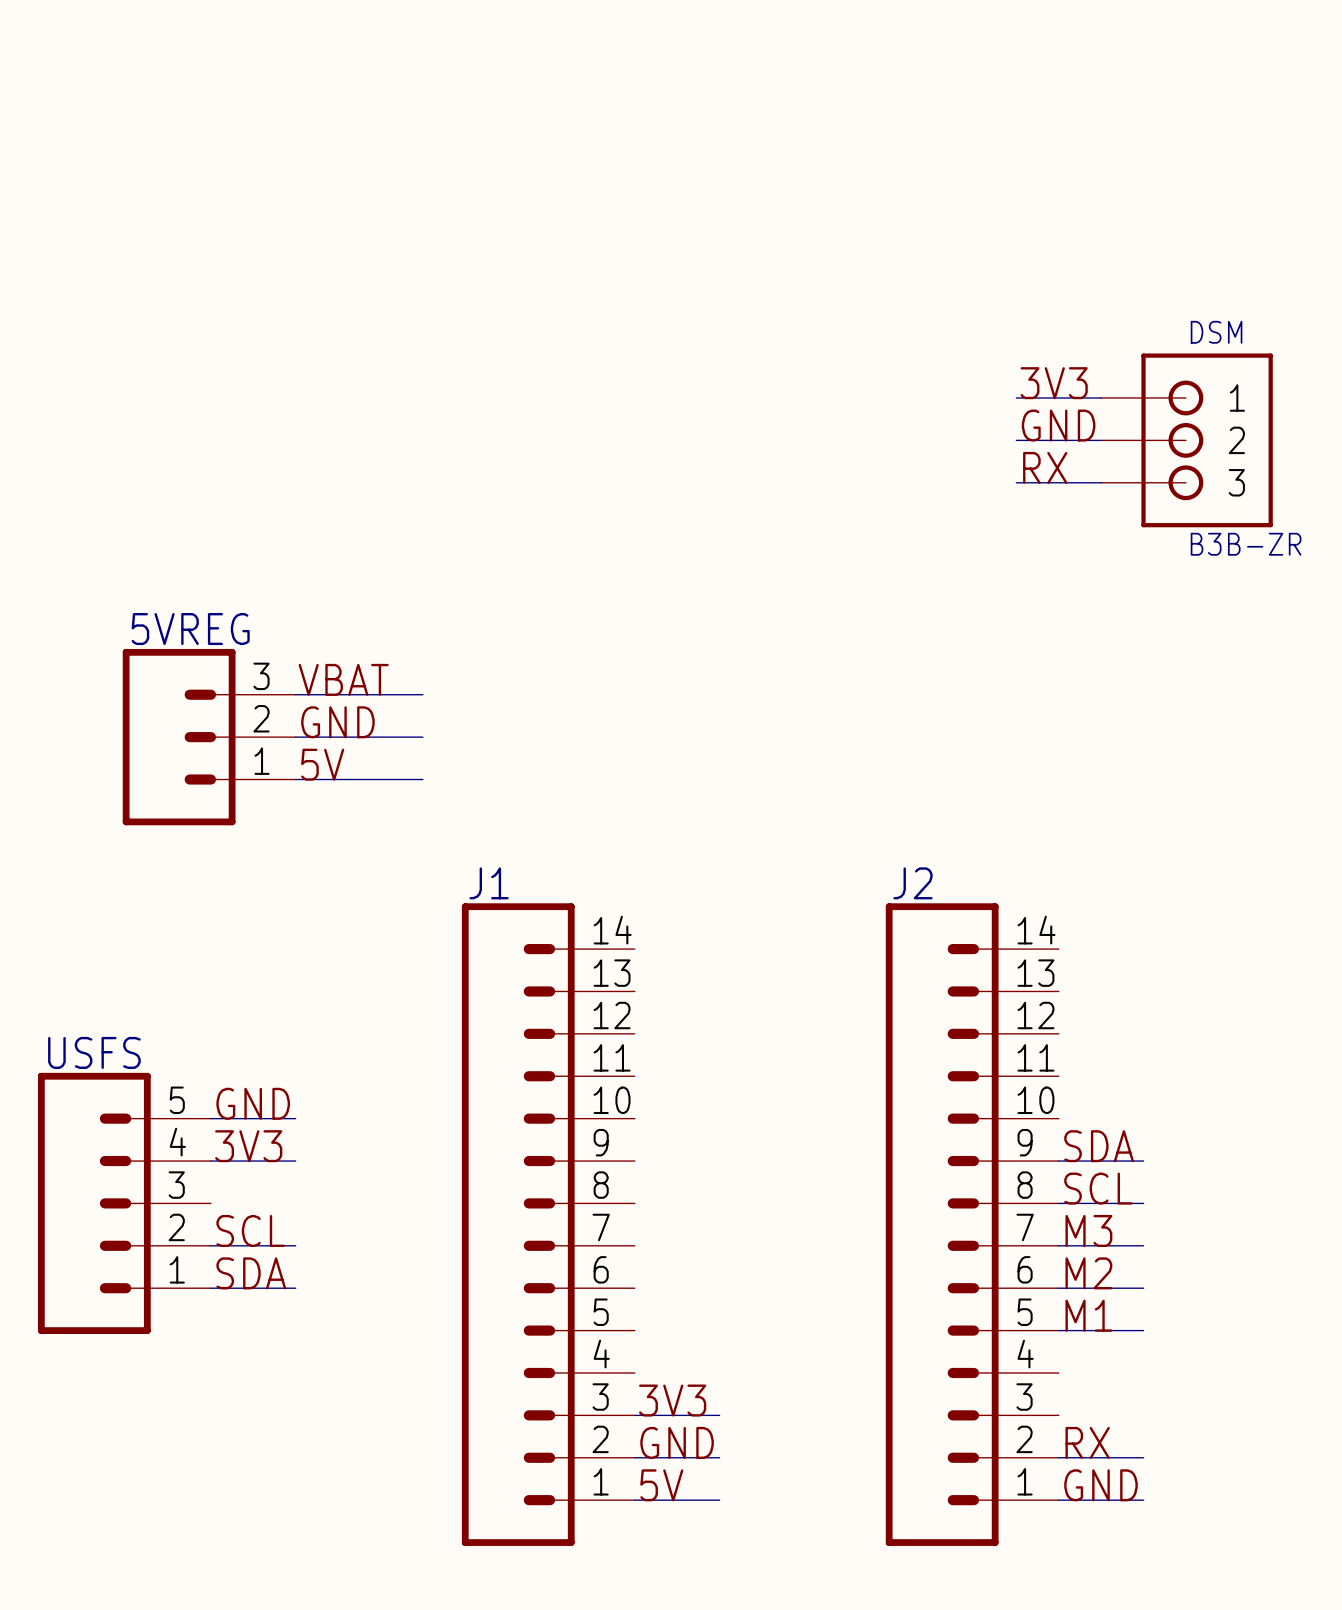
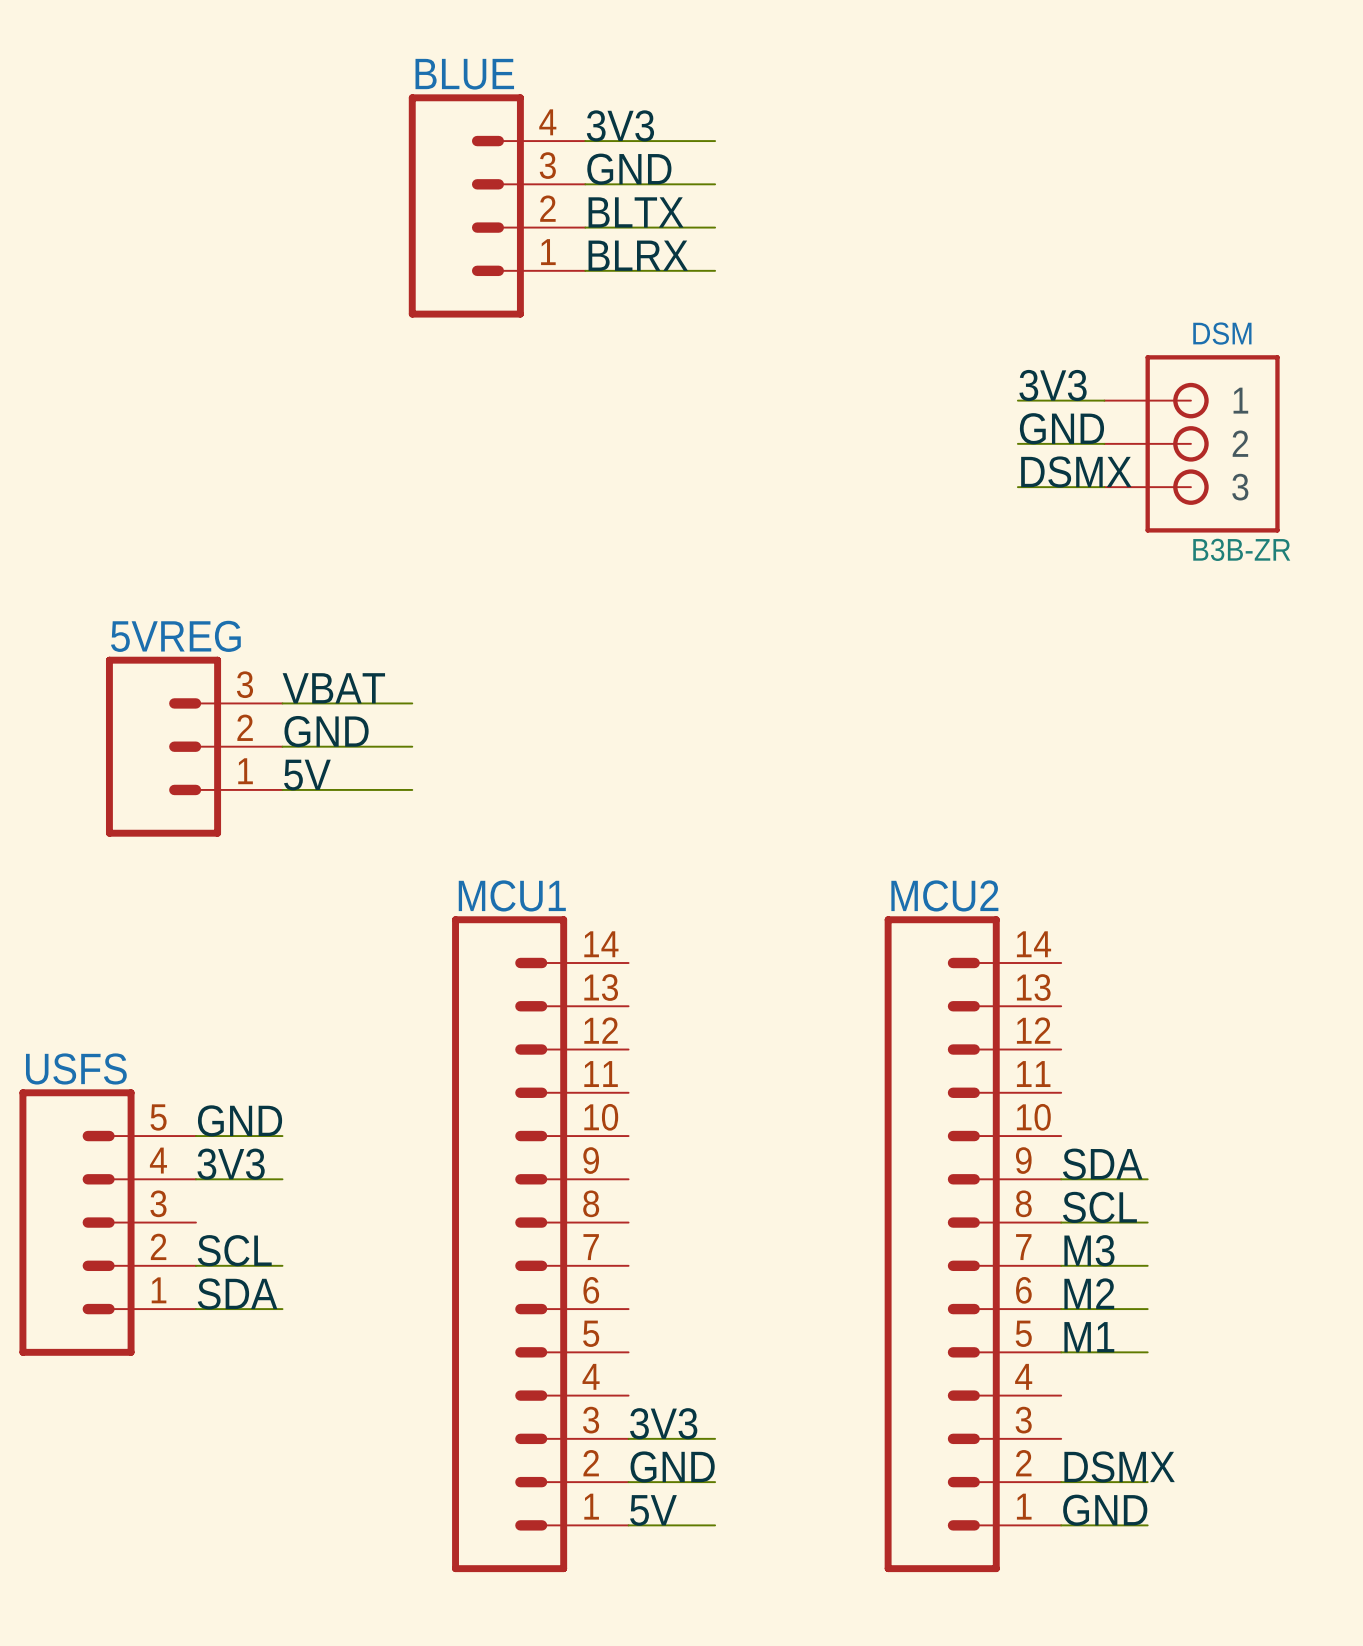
label: none -> 3V3 (620, 125)
wire: none -> (585, 141) (715, 141)
label: none -> GND (629, 169)
wire: none -> (585, 184) (715, 184)
BLUE: none -> (497, 205)
label: none -> BLTX (636, 212)
wire: none -> (585, 227) (715, 227)
label: none -> BLRX (638, 255)
wire: none -> (585, 270) (715, 270)
label: RX (1045, 467) -> DSMX (1076, 471)
J1 name: J1 (489, 883) -> MCU1 (512, 895)
J2 name: J2 (912, 883) -> MCU2 (944, 895)
label: RX (1087, 1442) -> DSMX (1119, 1466)

